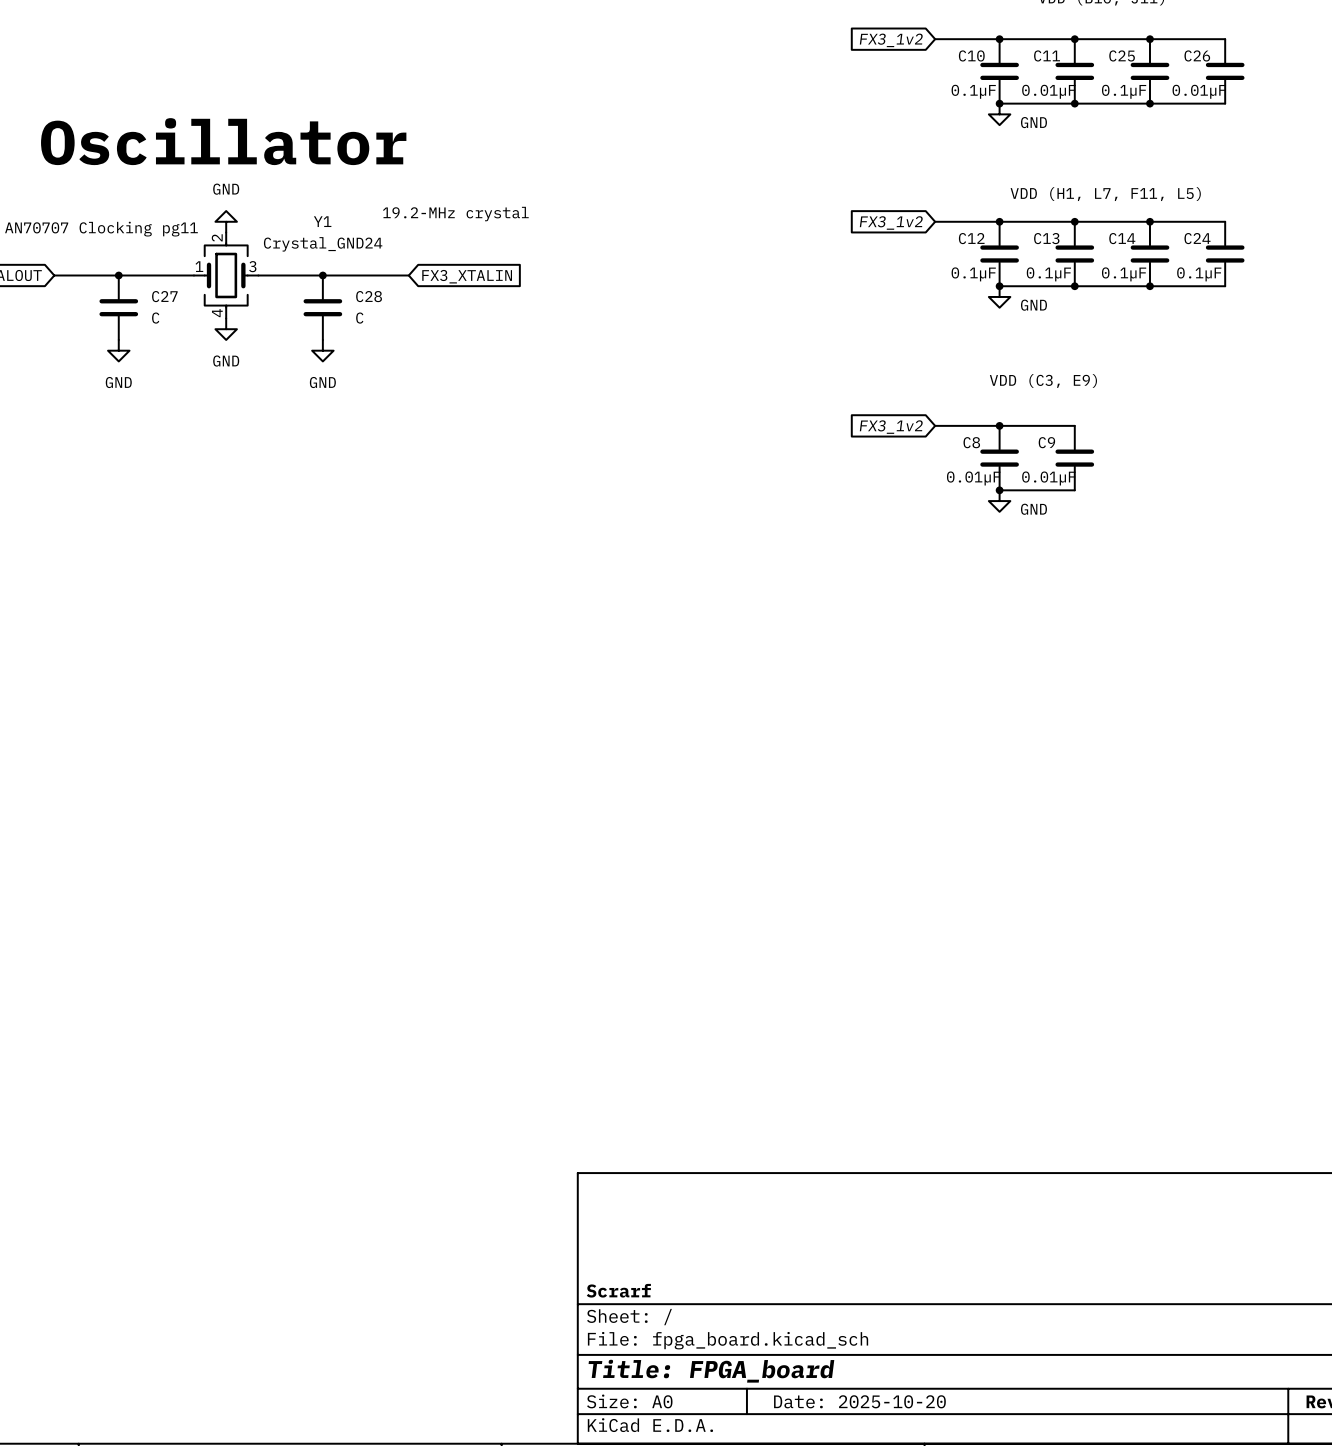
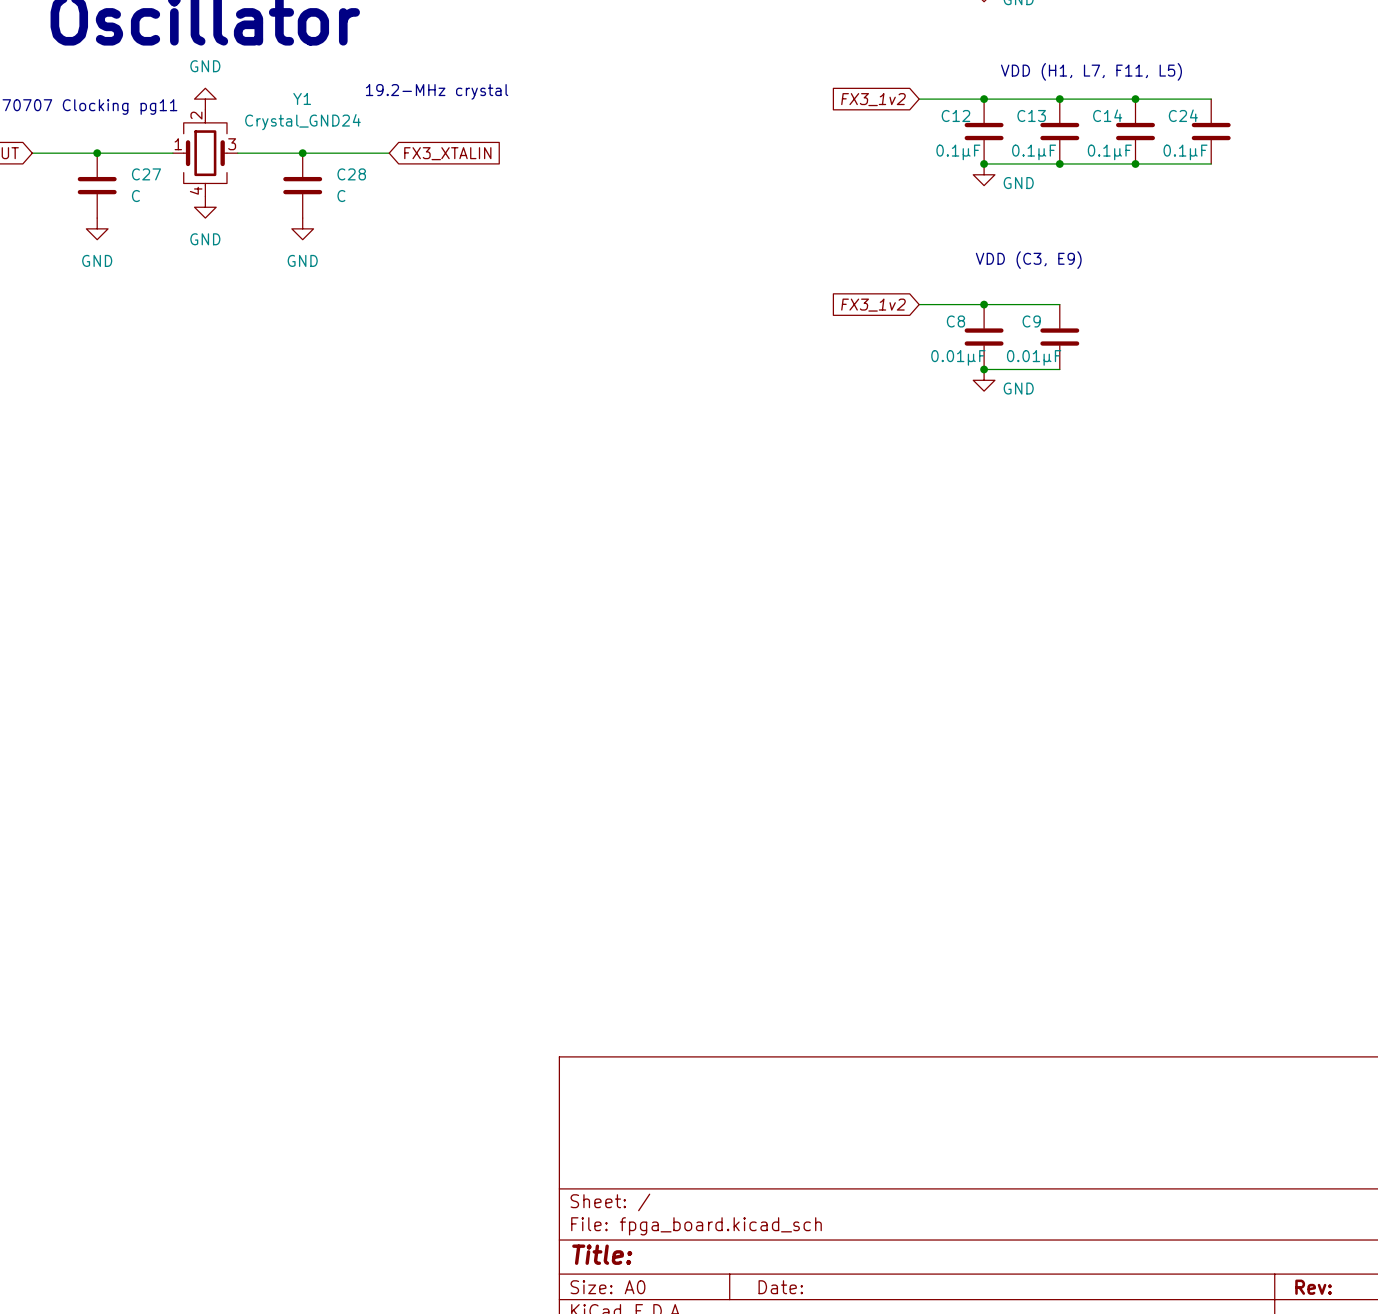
title block: Scrarf (618, 1290) -> none
title block: Title: FPGA_board (711, 1371) -> Title: (602, 1254)
title block: Date: 2025-10-20 (859, 1401) -> Date: (780, 1287)

